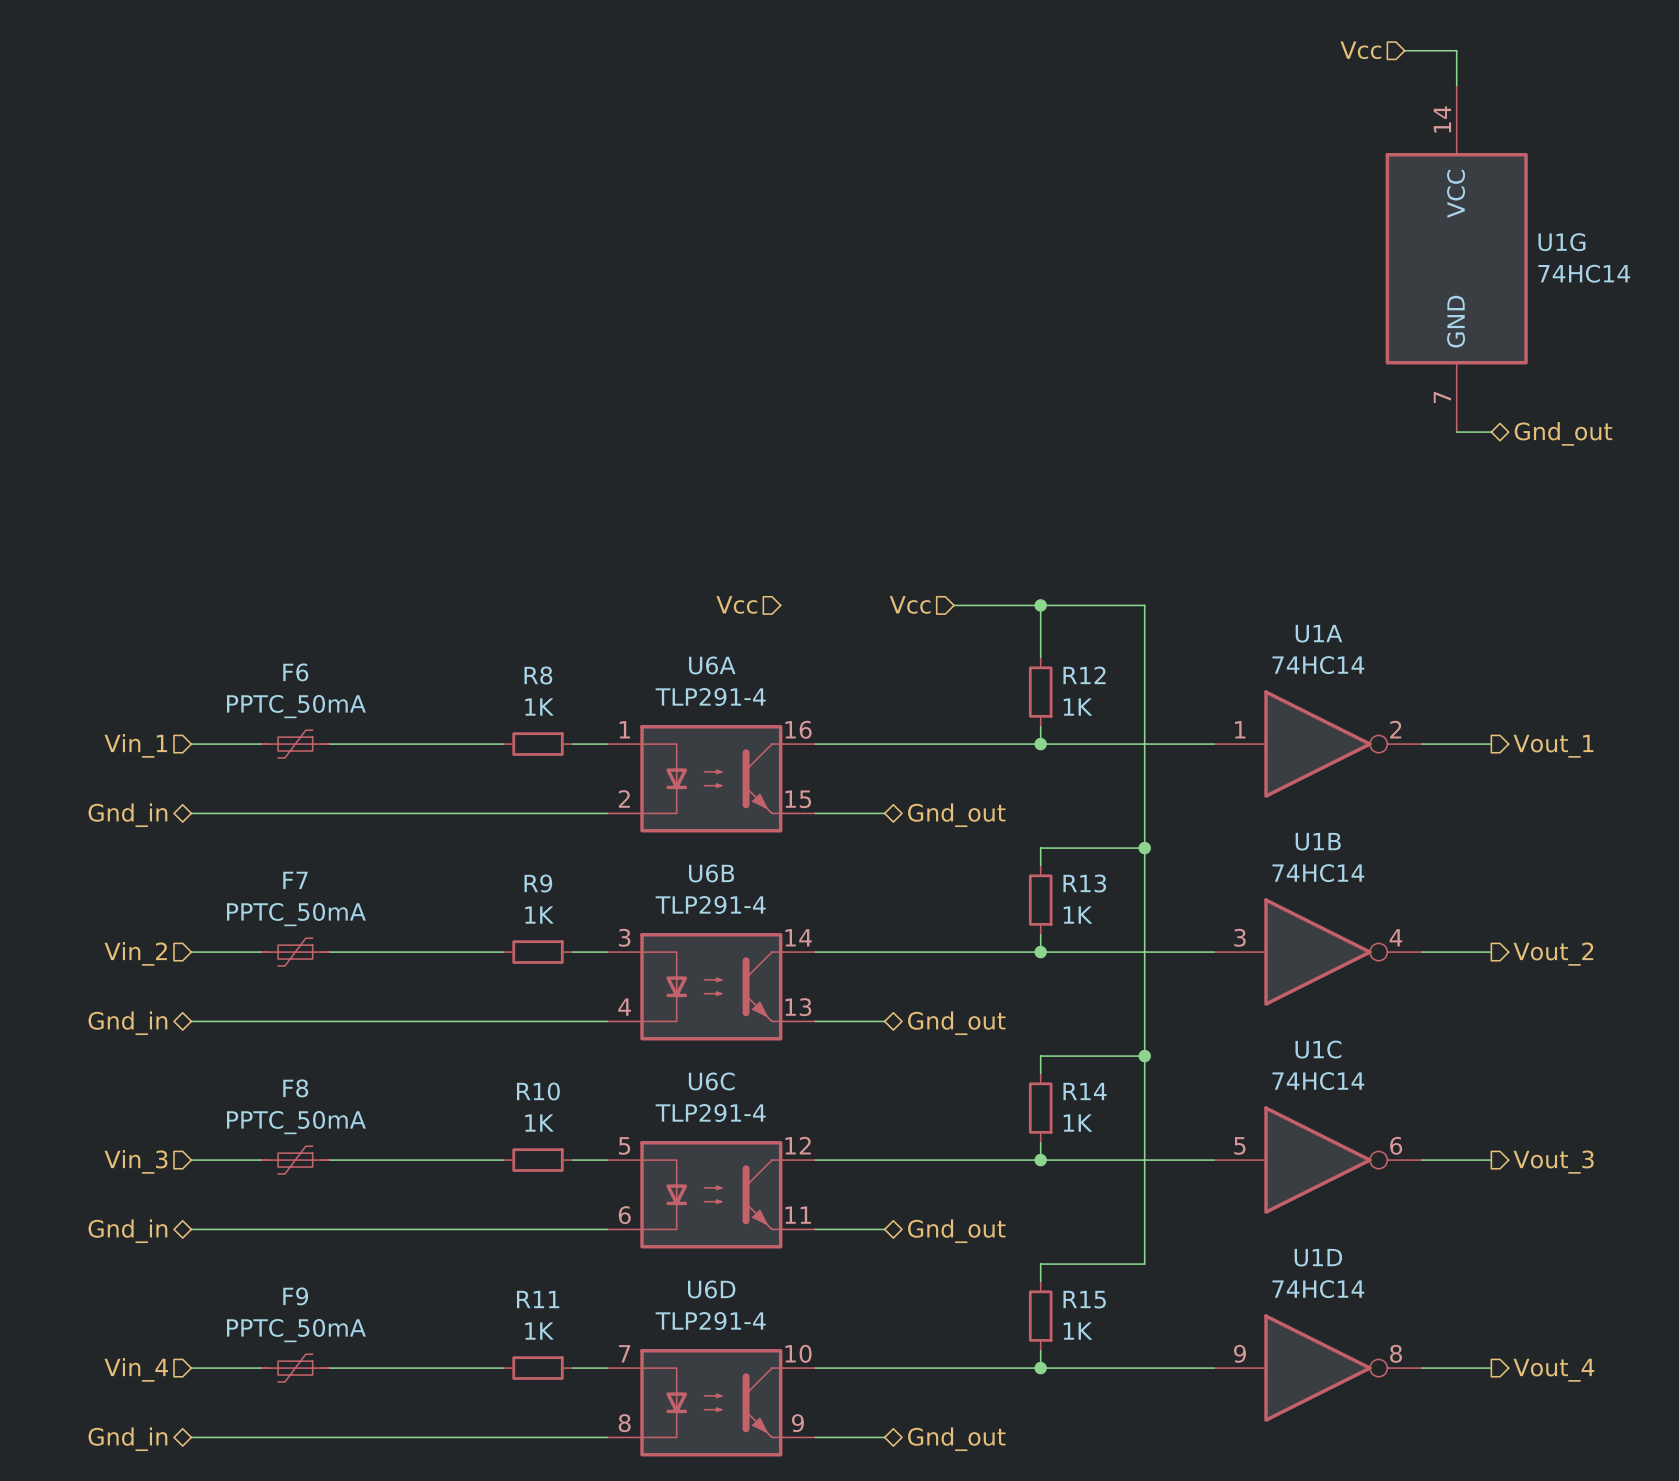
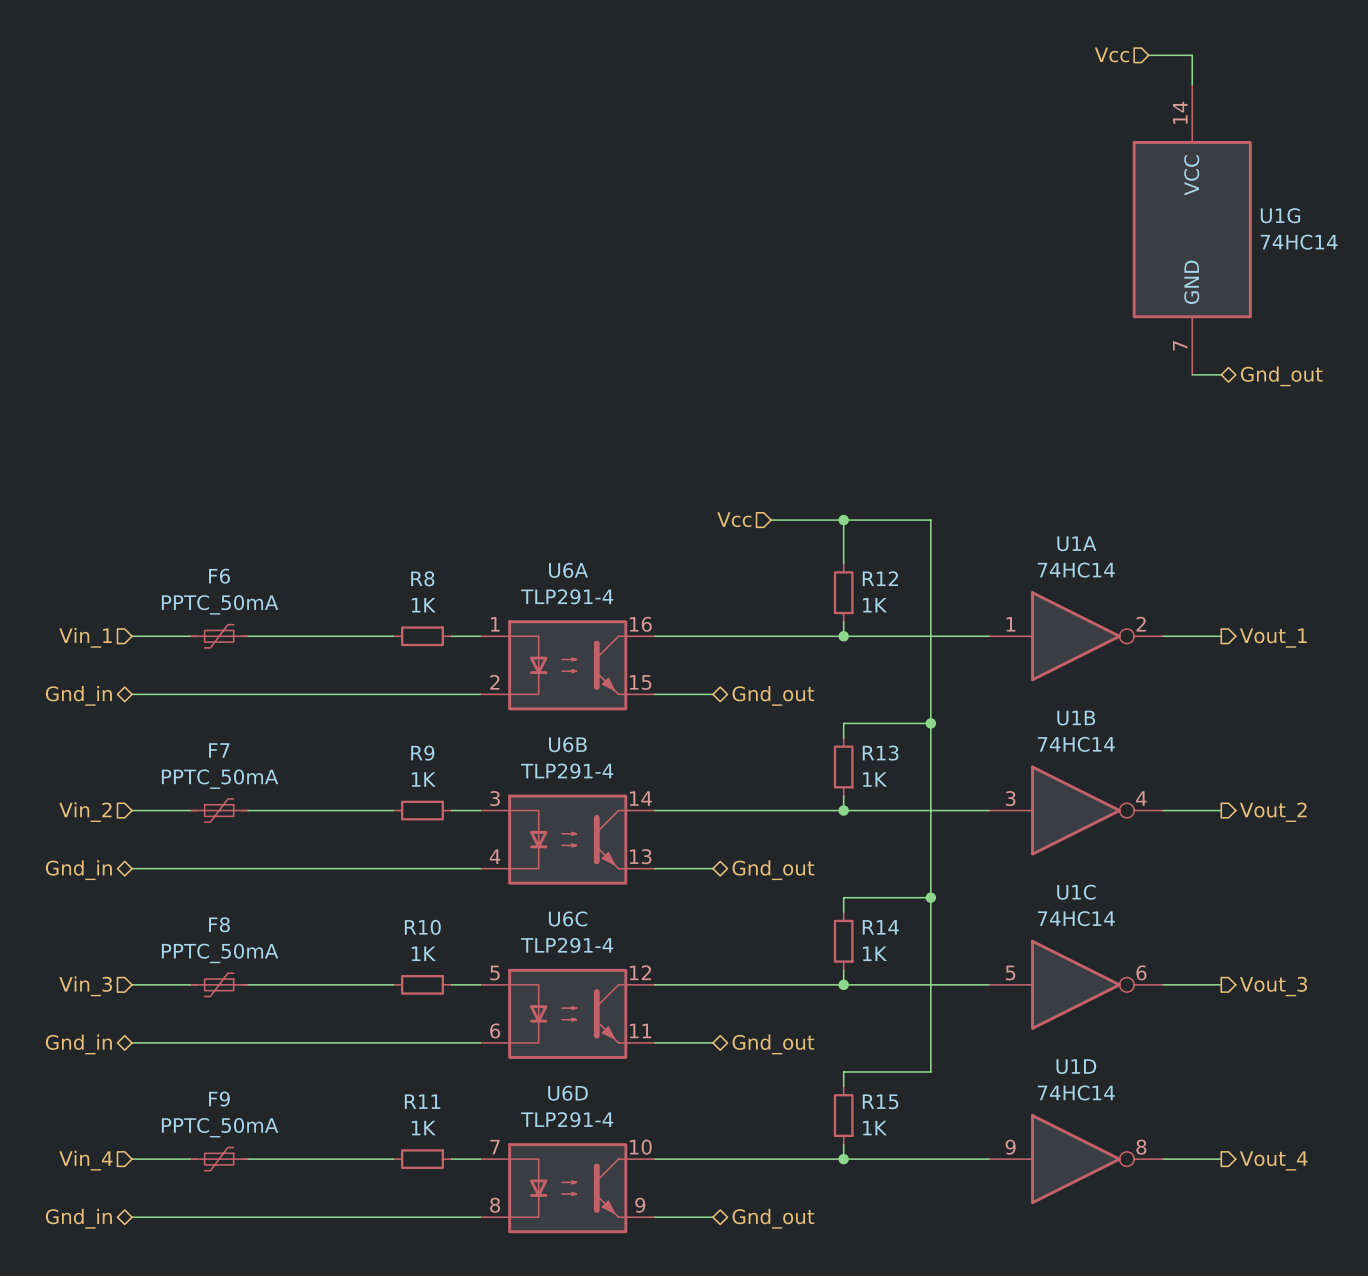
hierarchical label: Vcc (736, 604) -> none

